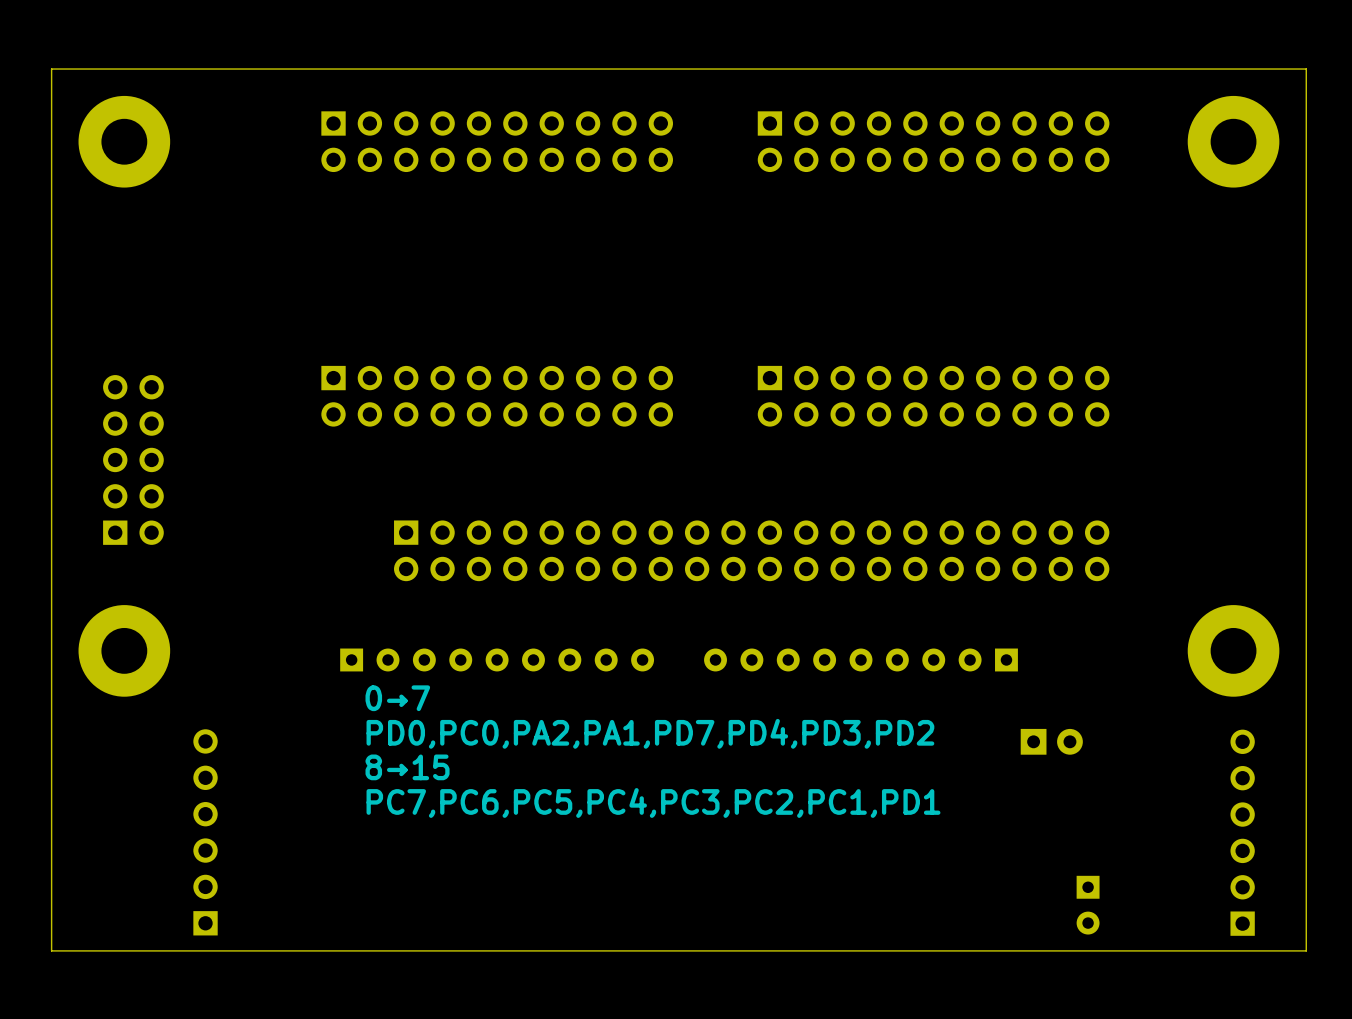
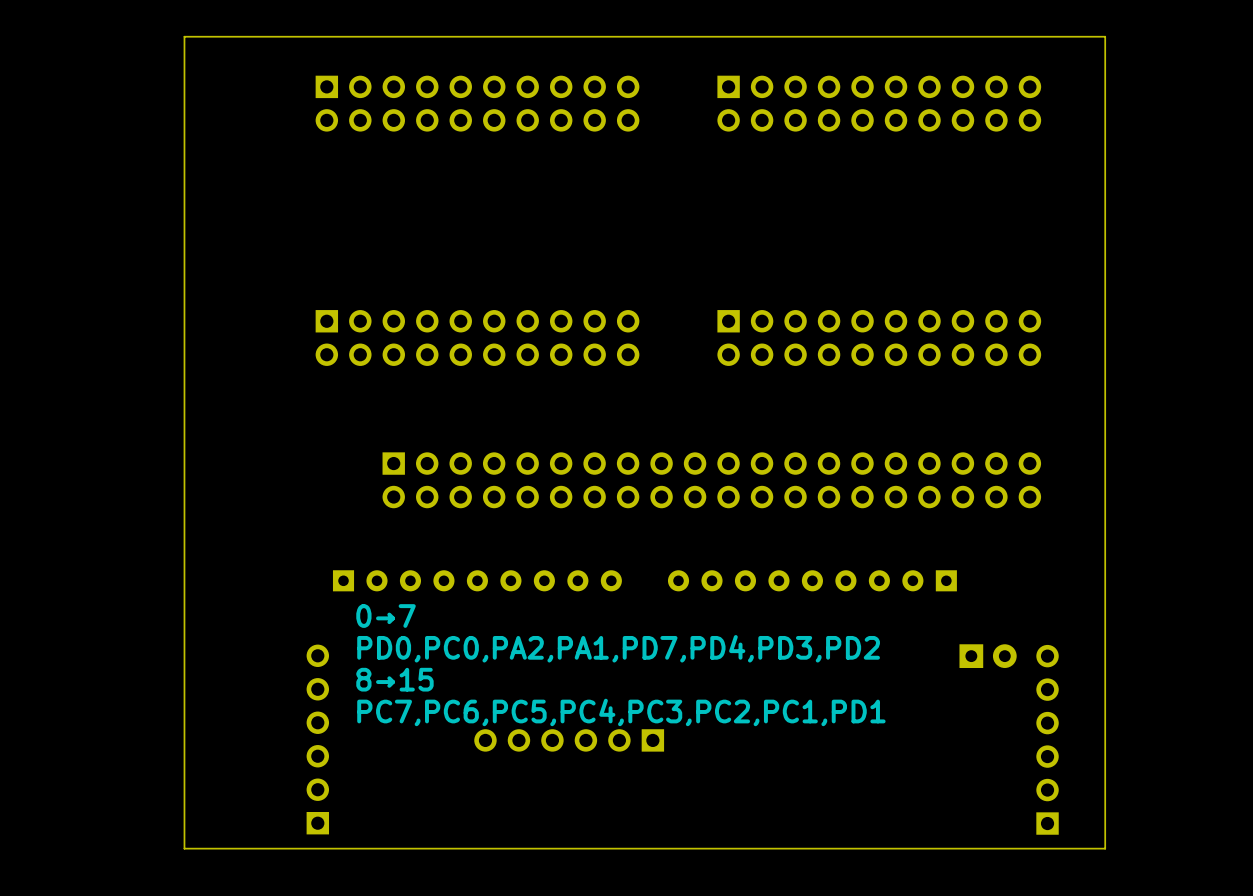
board edge: (178, 69) (51, 69) (51, 950) (178, 950) -> (184, 36) (184, 848)
board edge: (1178, 69) (1306, 69) (1306, 950) (1178, 950) -> (1105, 36) (1105, 848)
part: (124, 141) -> none
part: (1233, 141) -> none
part: (133, 459) -> none
part: (124, 650) -> none
part: (1233, 650) -> none
part position: (205, 832) -> (317, 739)
part position: (1242, 832) -> (1047, 739)
part: none -> (569, 740)
part: (1088, 905) -> none

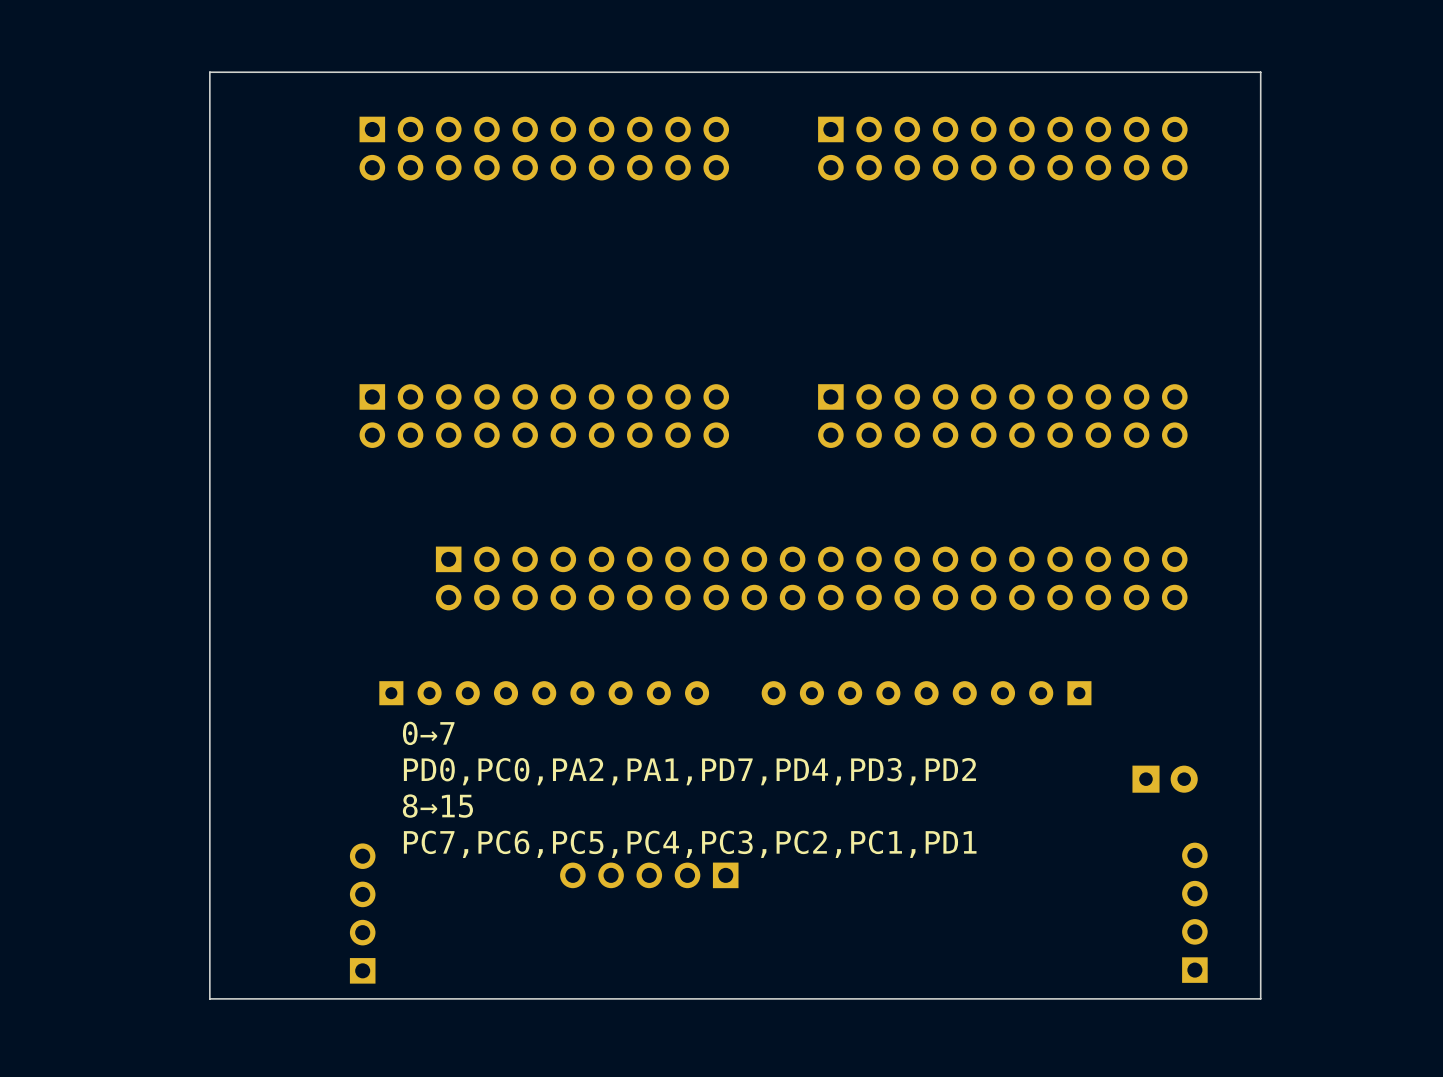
part position: (988, 656) -> (1165, 779)
part footprint: [474, 729, 665, 752] -> [560, 862, 739, 889]
part: (317, 739) -> none
part: (1047, 739) -> none
part: none -> (362, 913)

